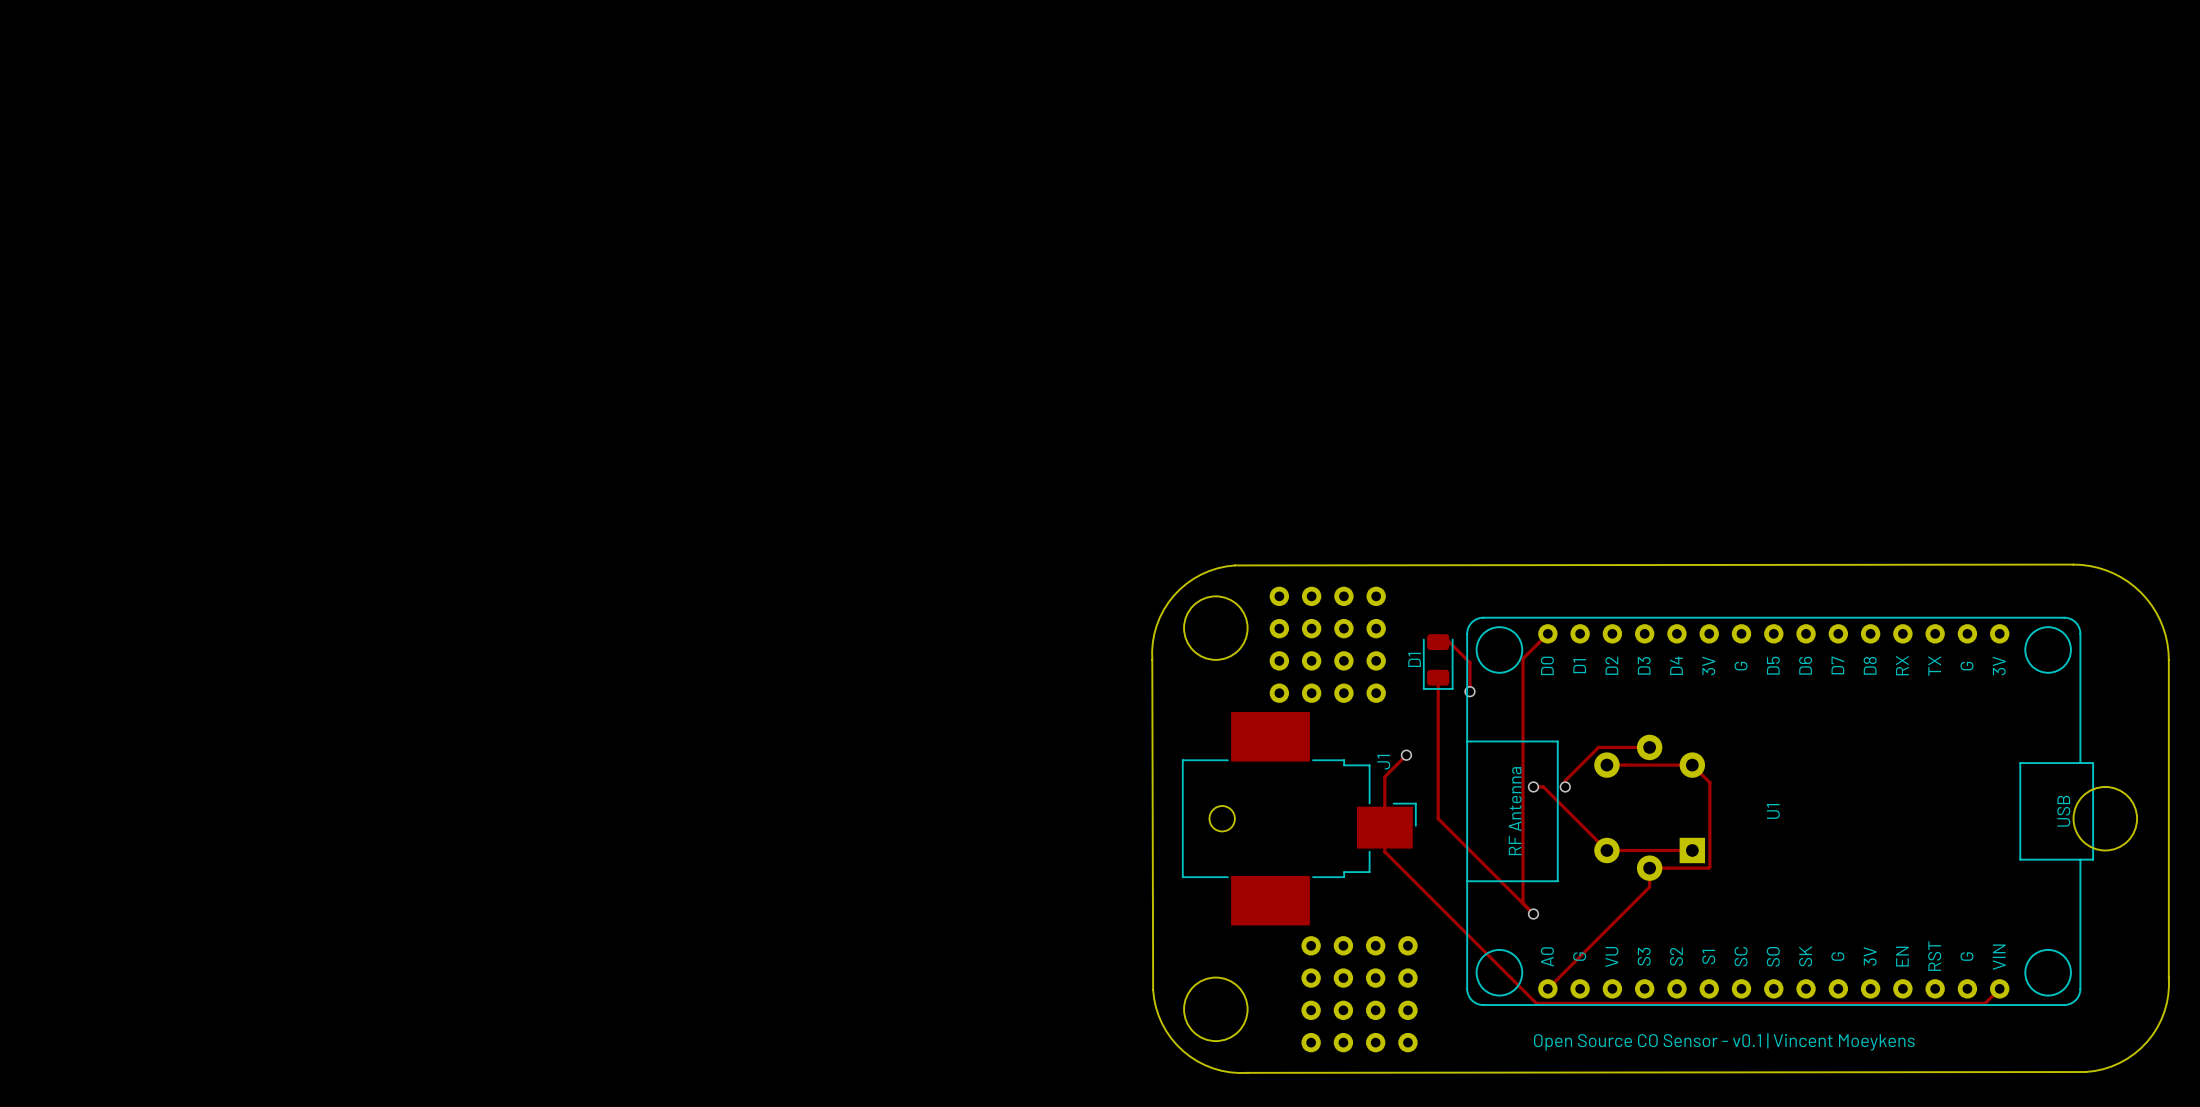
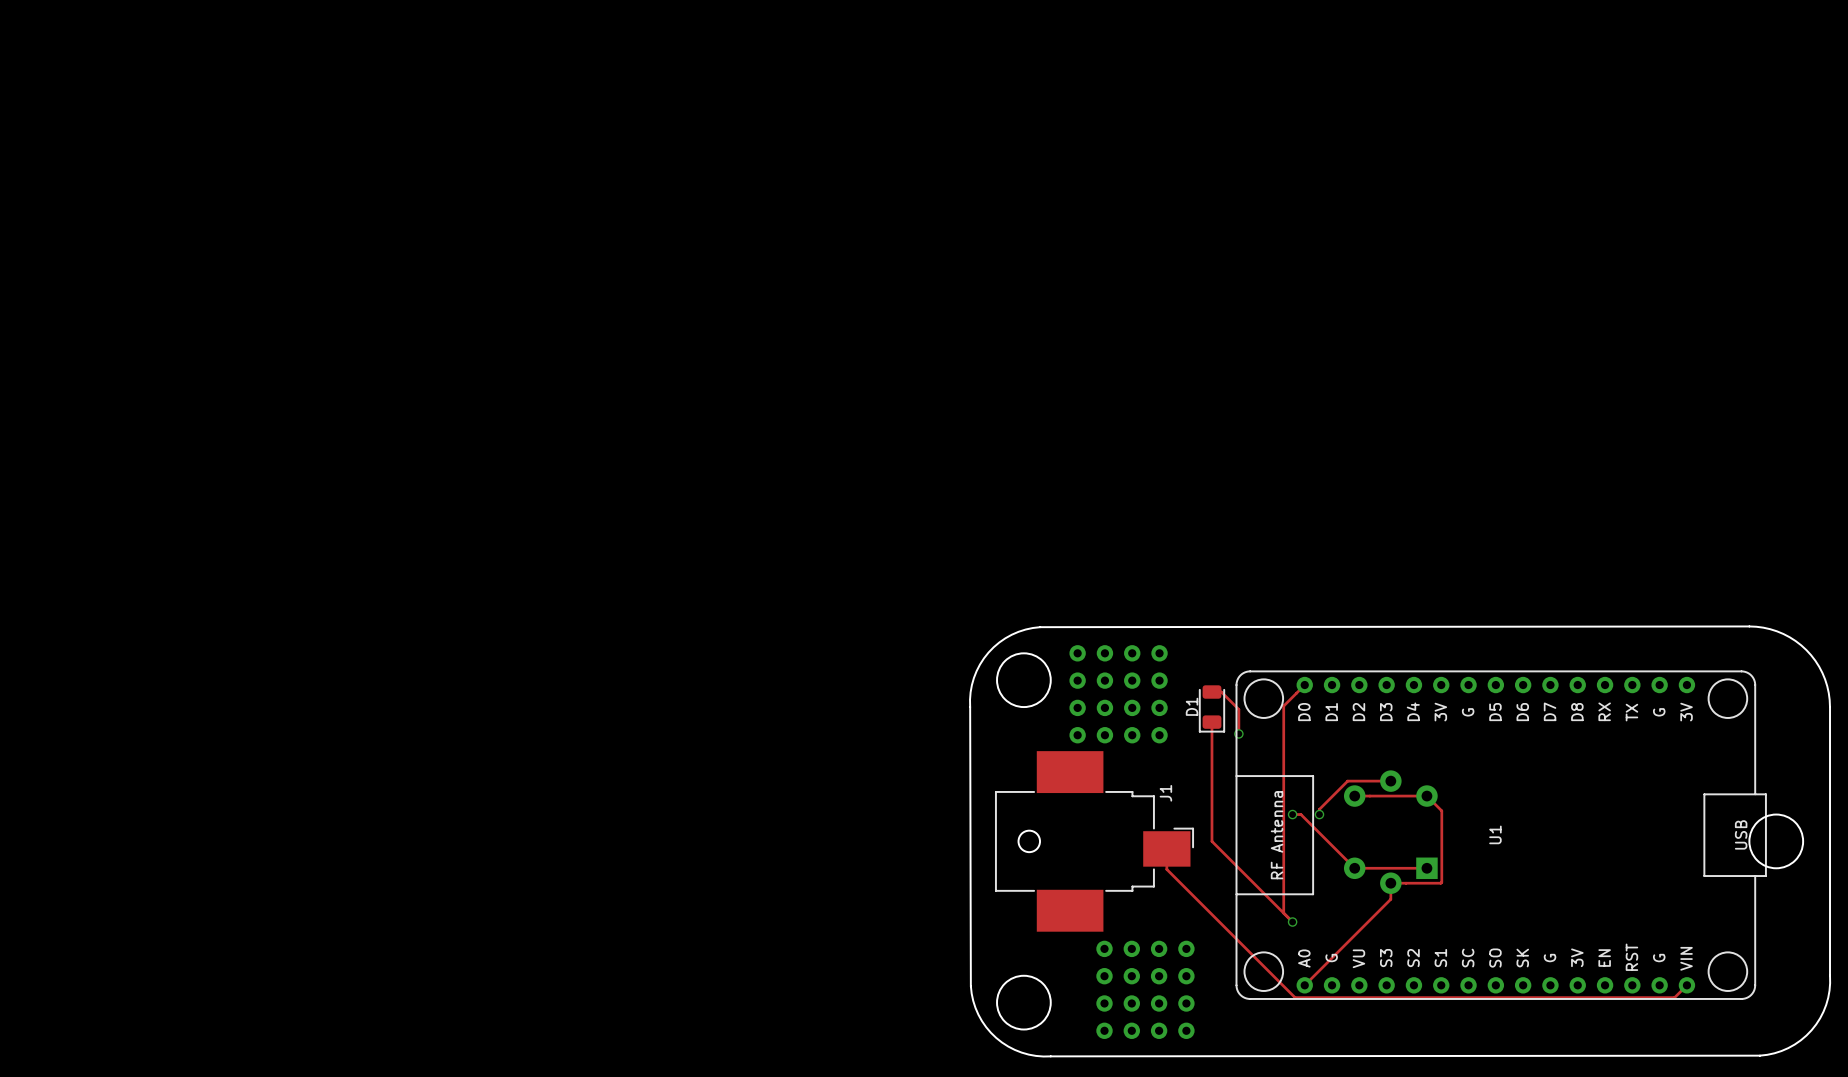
track: (1406, 755) (1384, 776) (1384, 827) -> none
via: (1406, 755) -> none
text: Open Source CO Sensor - v0.1 | Vincent Moeykens (1724, 1041) -> none

